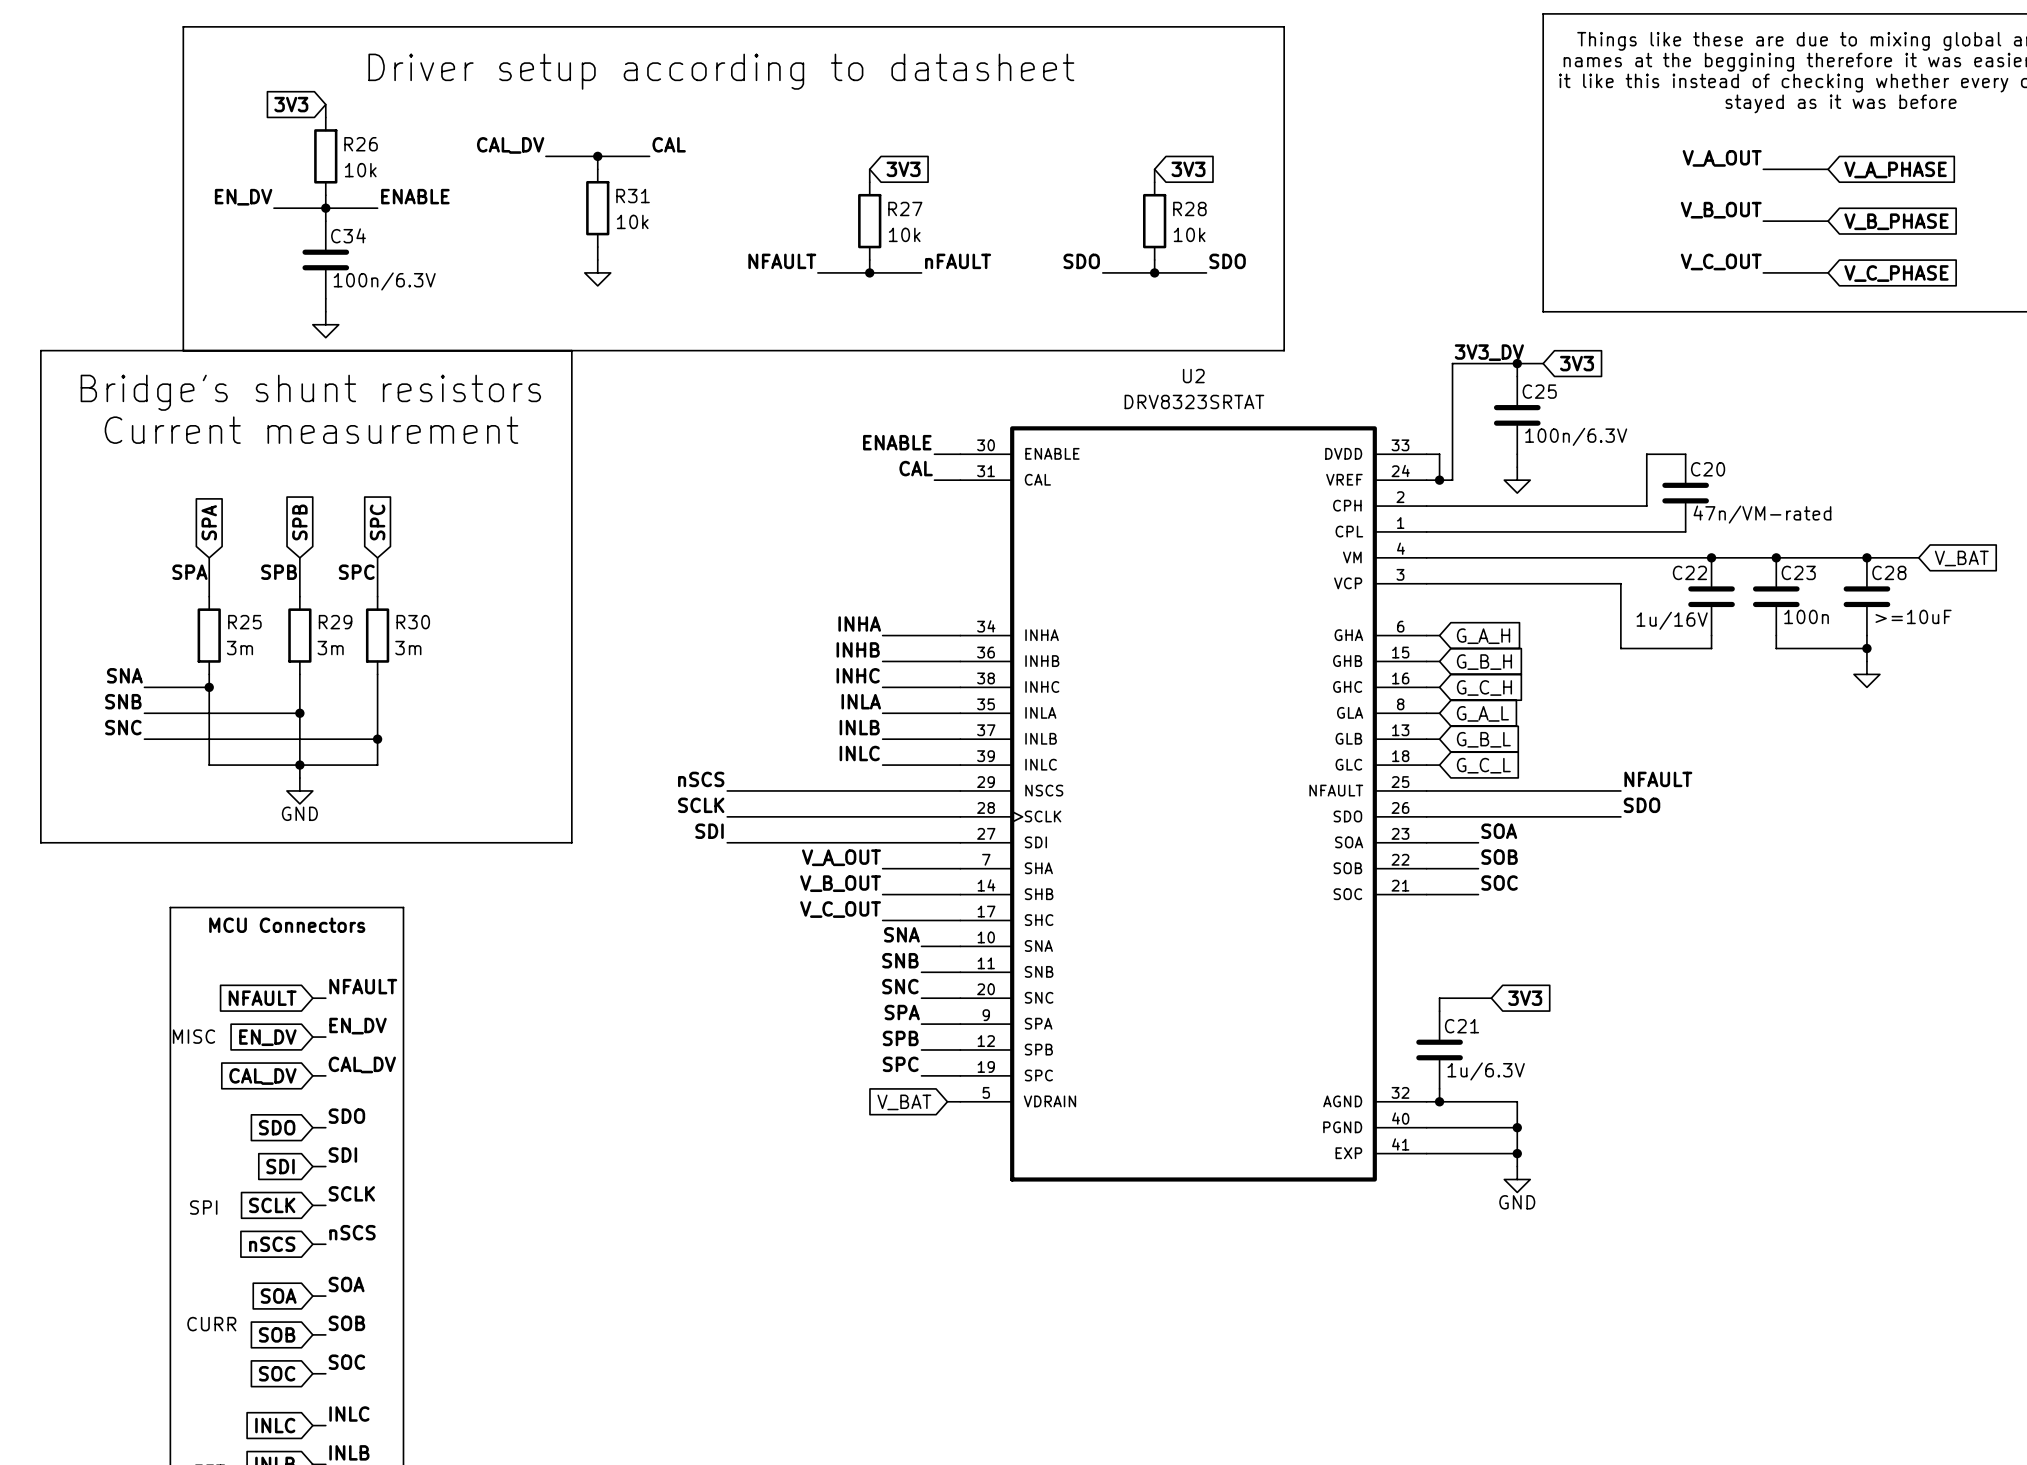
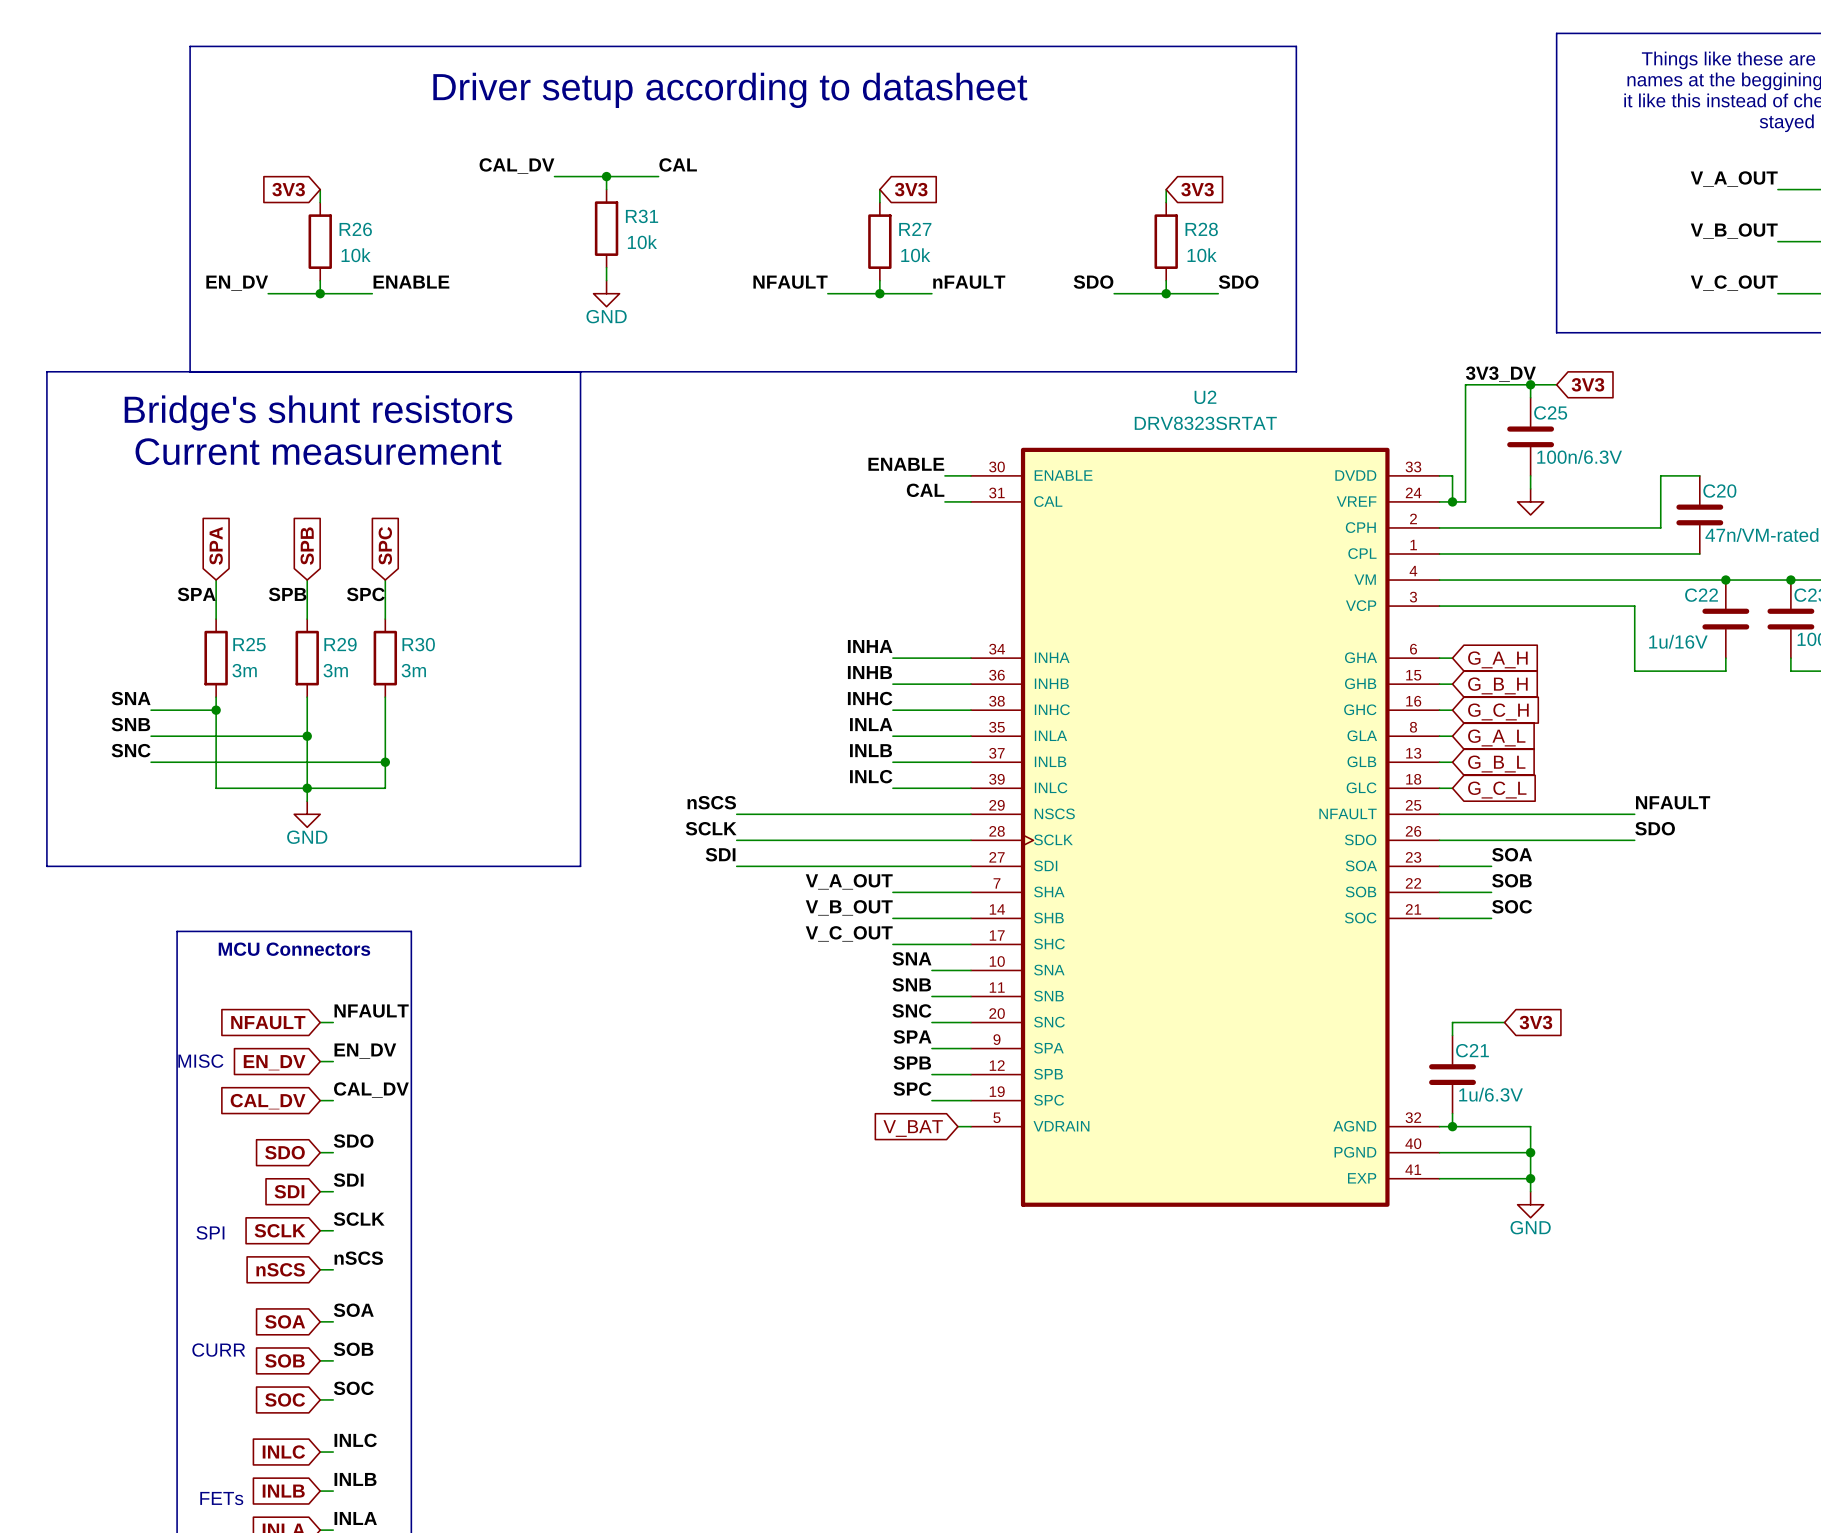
global label position: 3V3 (291, 104) -> 3V3 (288, 189)
wire: (325, 104) (325, 117) -> (320, 189) (320, 202)
R26 position: (325, 156) -> (320, 241)
wire: (325, 195) (325, 221) -> none
label position: ENABLE (415, 196) -> ENABLE (411, 282)
label position: EN_DV (243, 197) -> EN_DV (237, 283)
wire: (273, 208) (377, 208) -> (268, 293) (372, 293)
junction: (325, 208) -> none
C34: 100n/6.3V (325, 259) -> none
junction: none -> (320, 293)
power symbol text: none -> GND (606, 316)
wire: (325, 298) (325, 311) -> (320, 280) (320, 293)
power symbol: (325, 324) -> none

